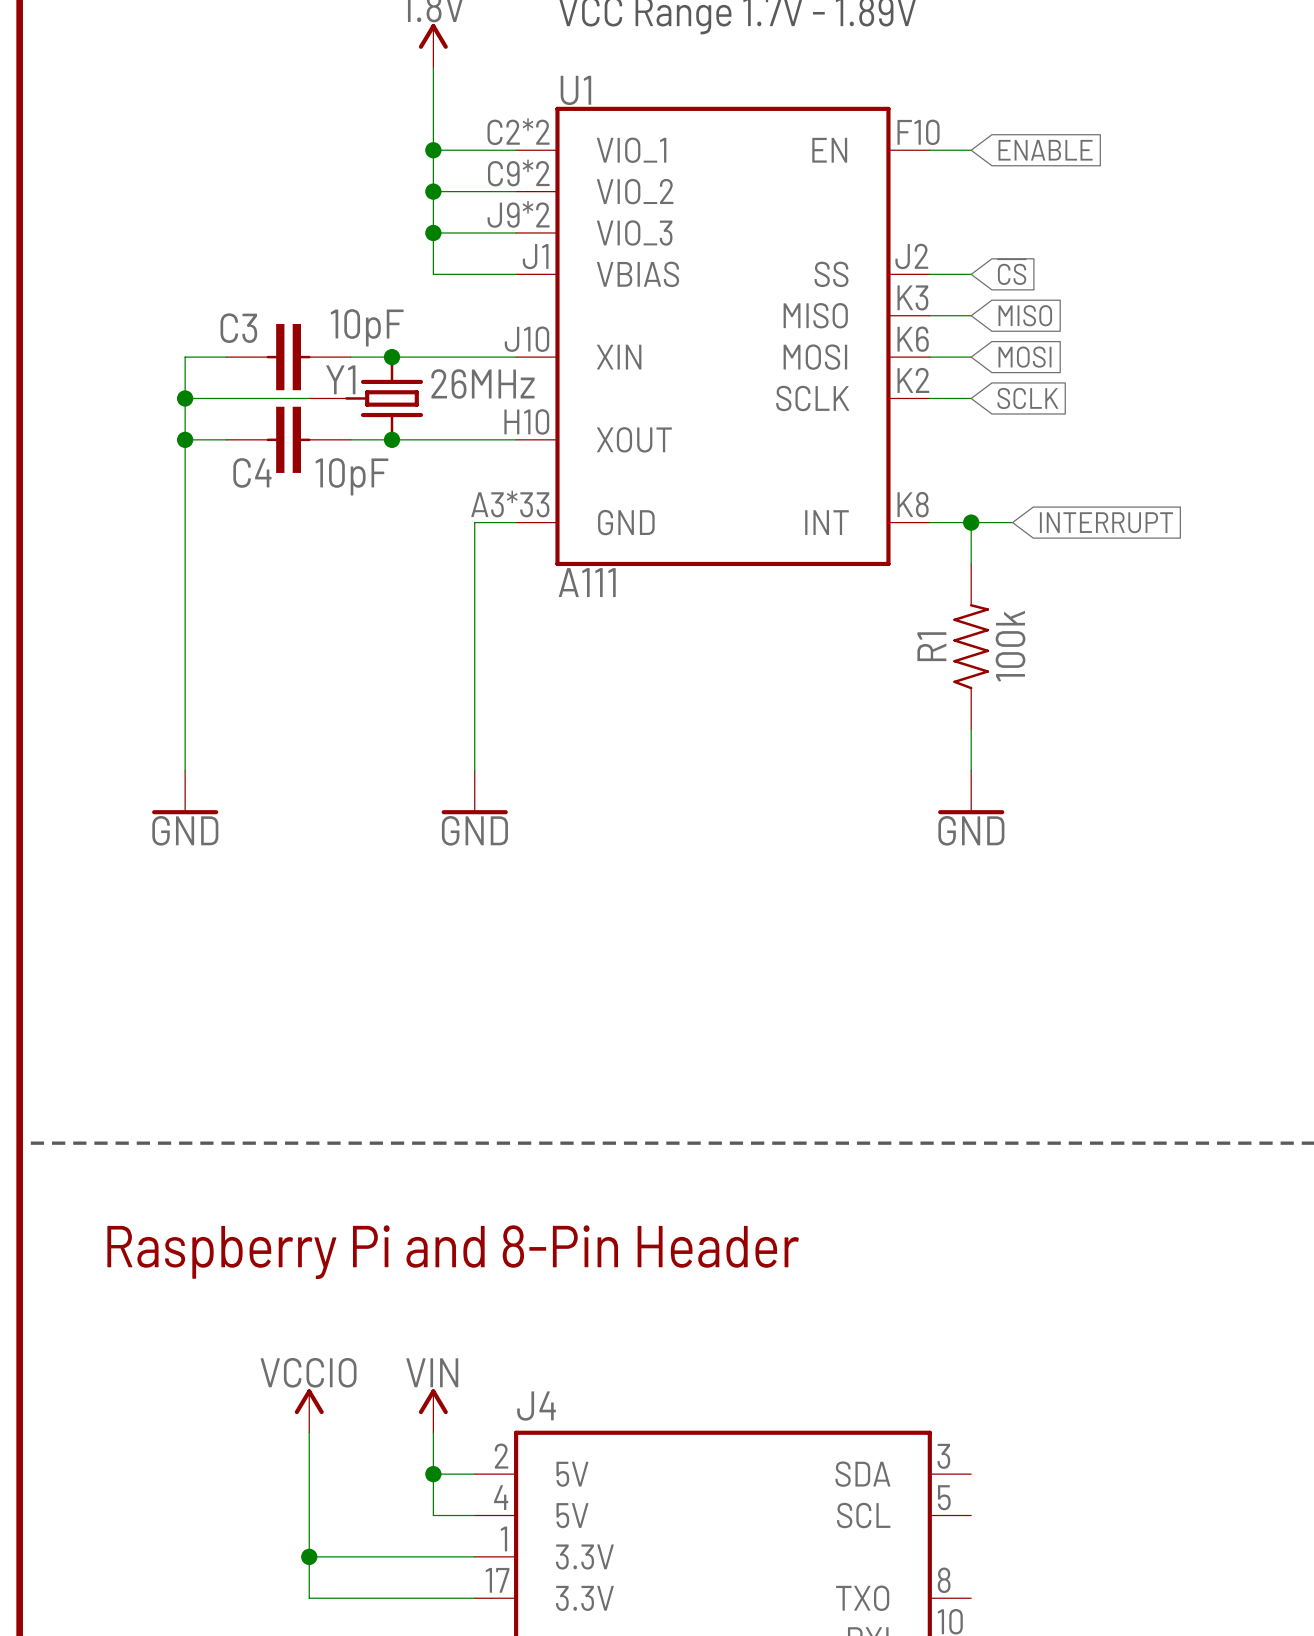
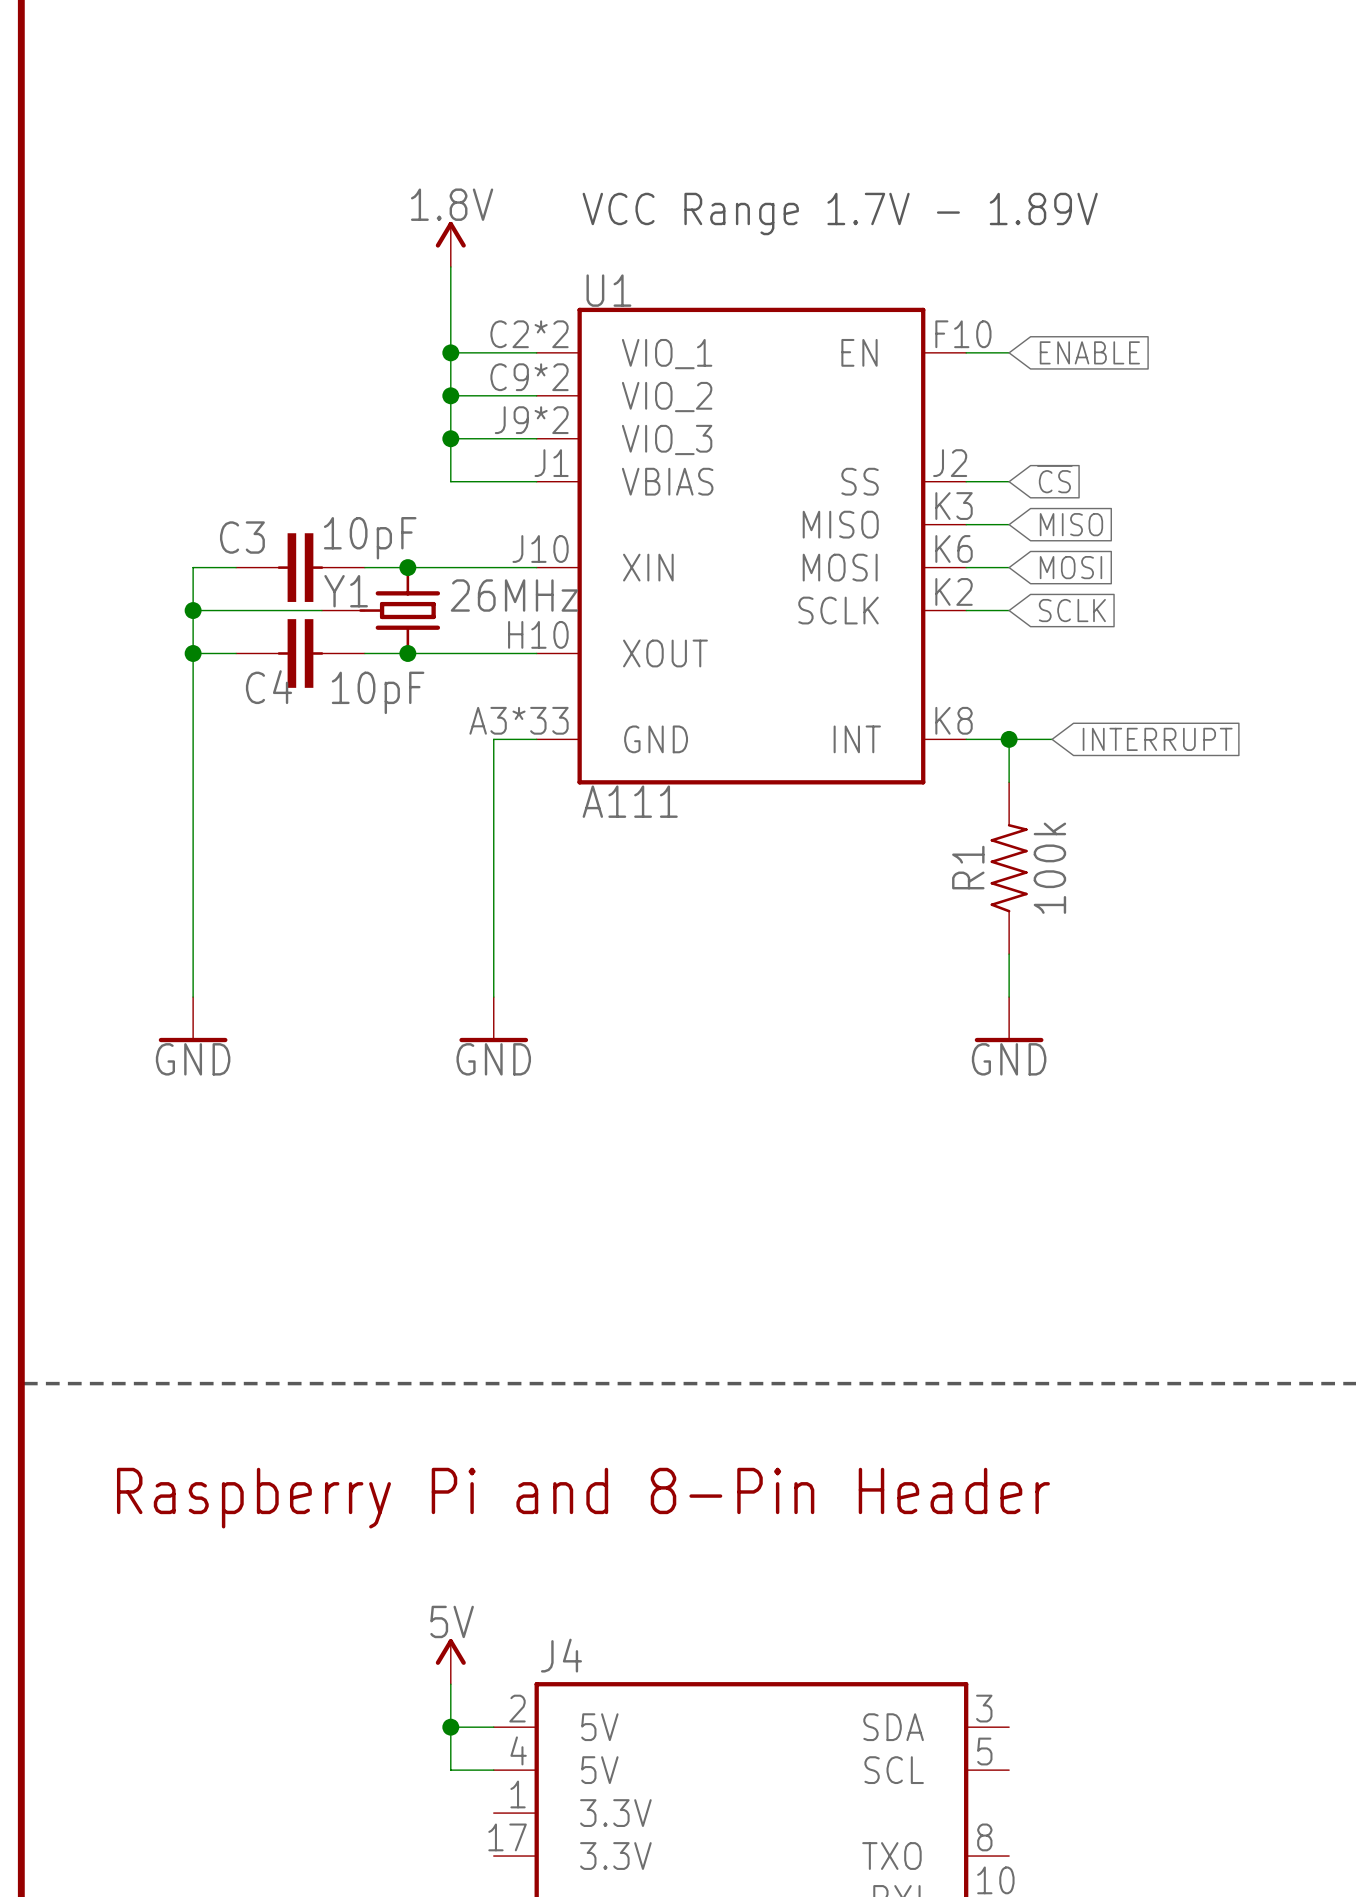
power symbol: VCCIO (309, 1411) -> none
power symbol: VIN (433, 1411) -> 5V (450, 1661)
wire: (309, 1432) (309, 1598) (474, 1598) -> none
wire: (309, 1556) (474, 1556) -> none
junction: (309, 1556) -> none

